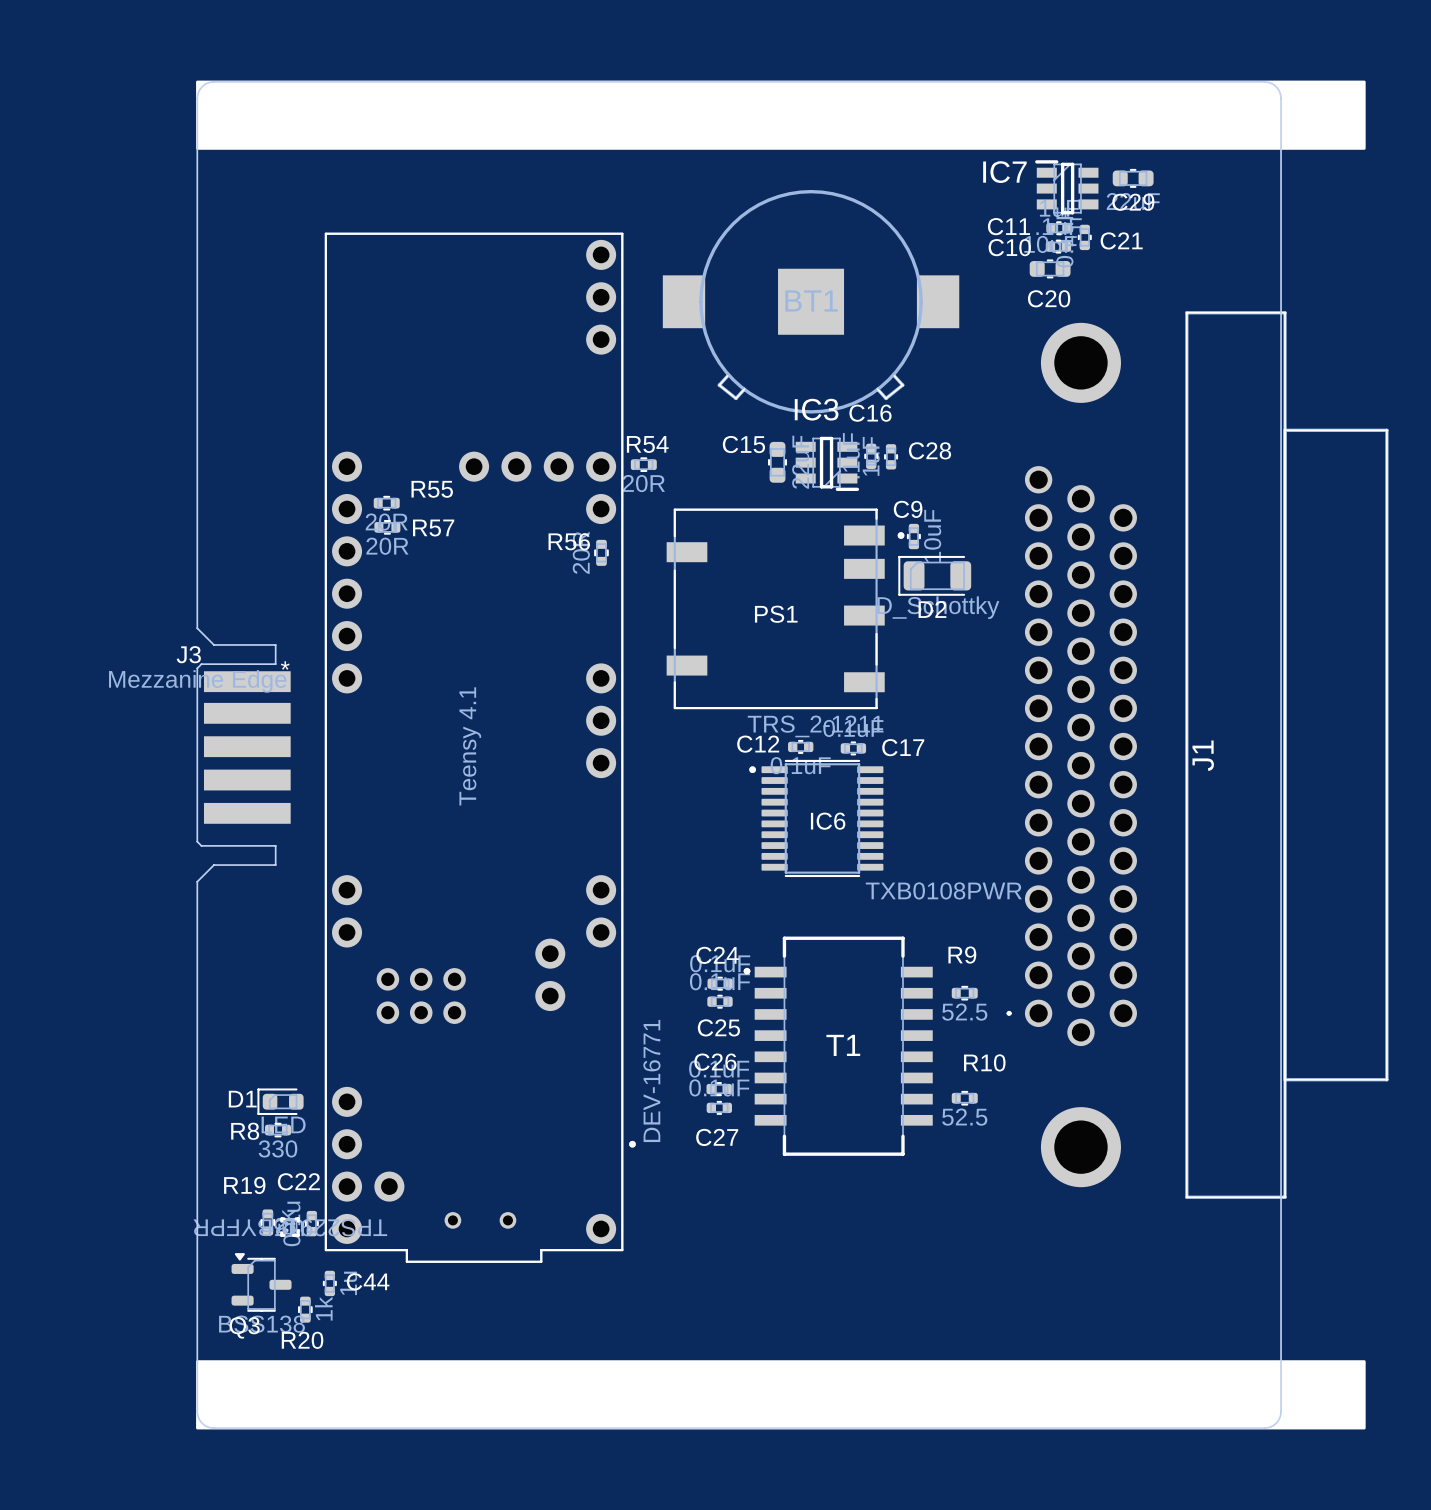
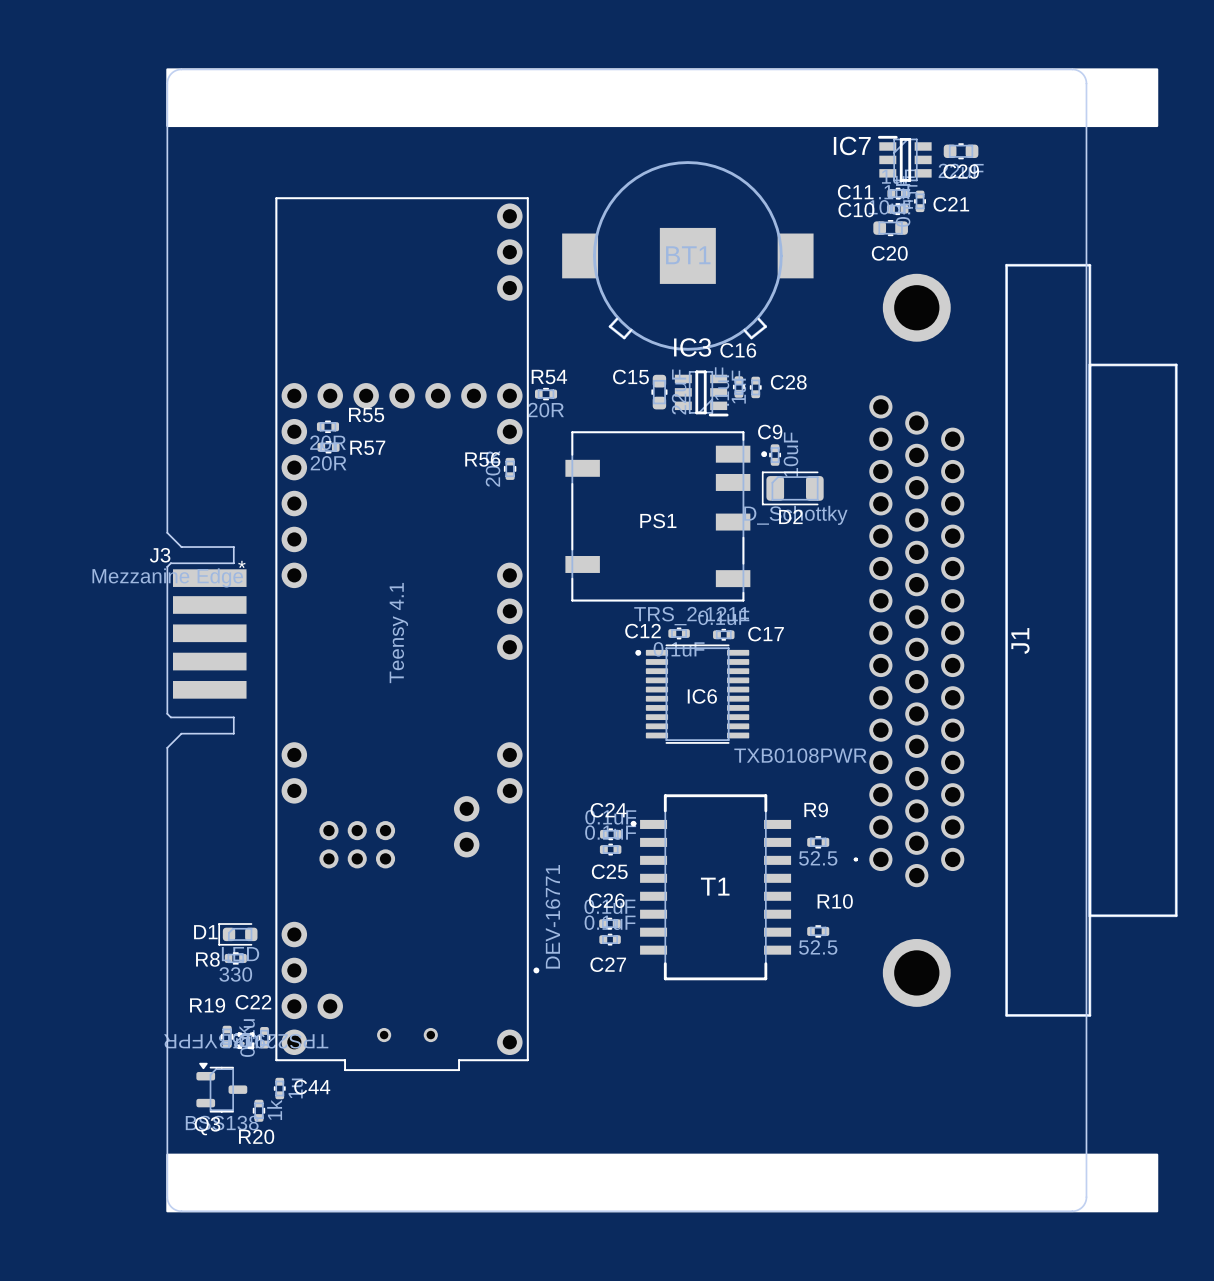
part footprint: [324, 232, 636, 1263] -> [275, 197, 540, 1072]

